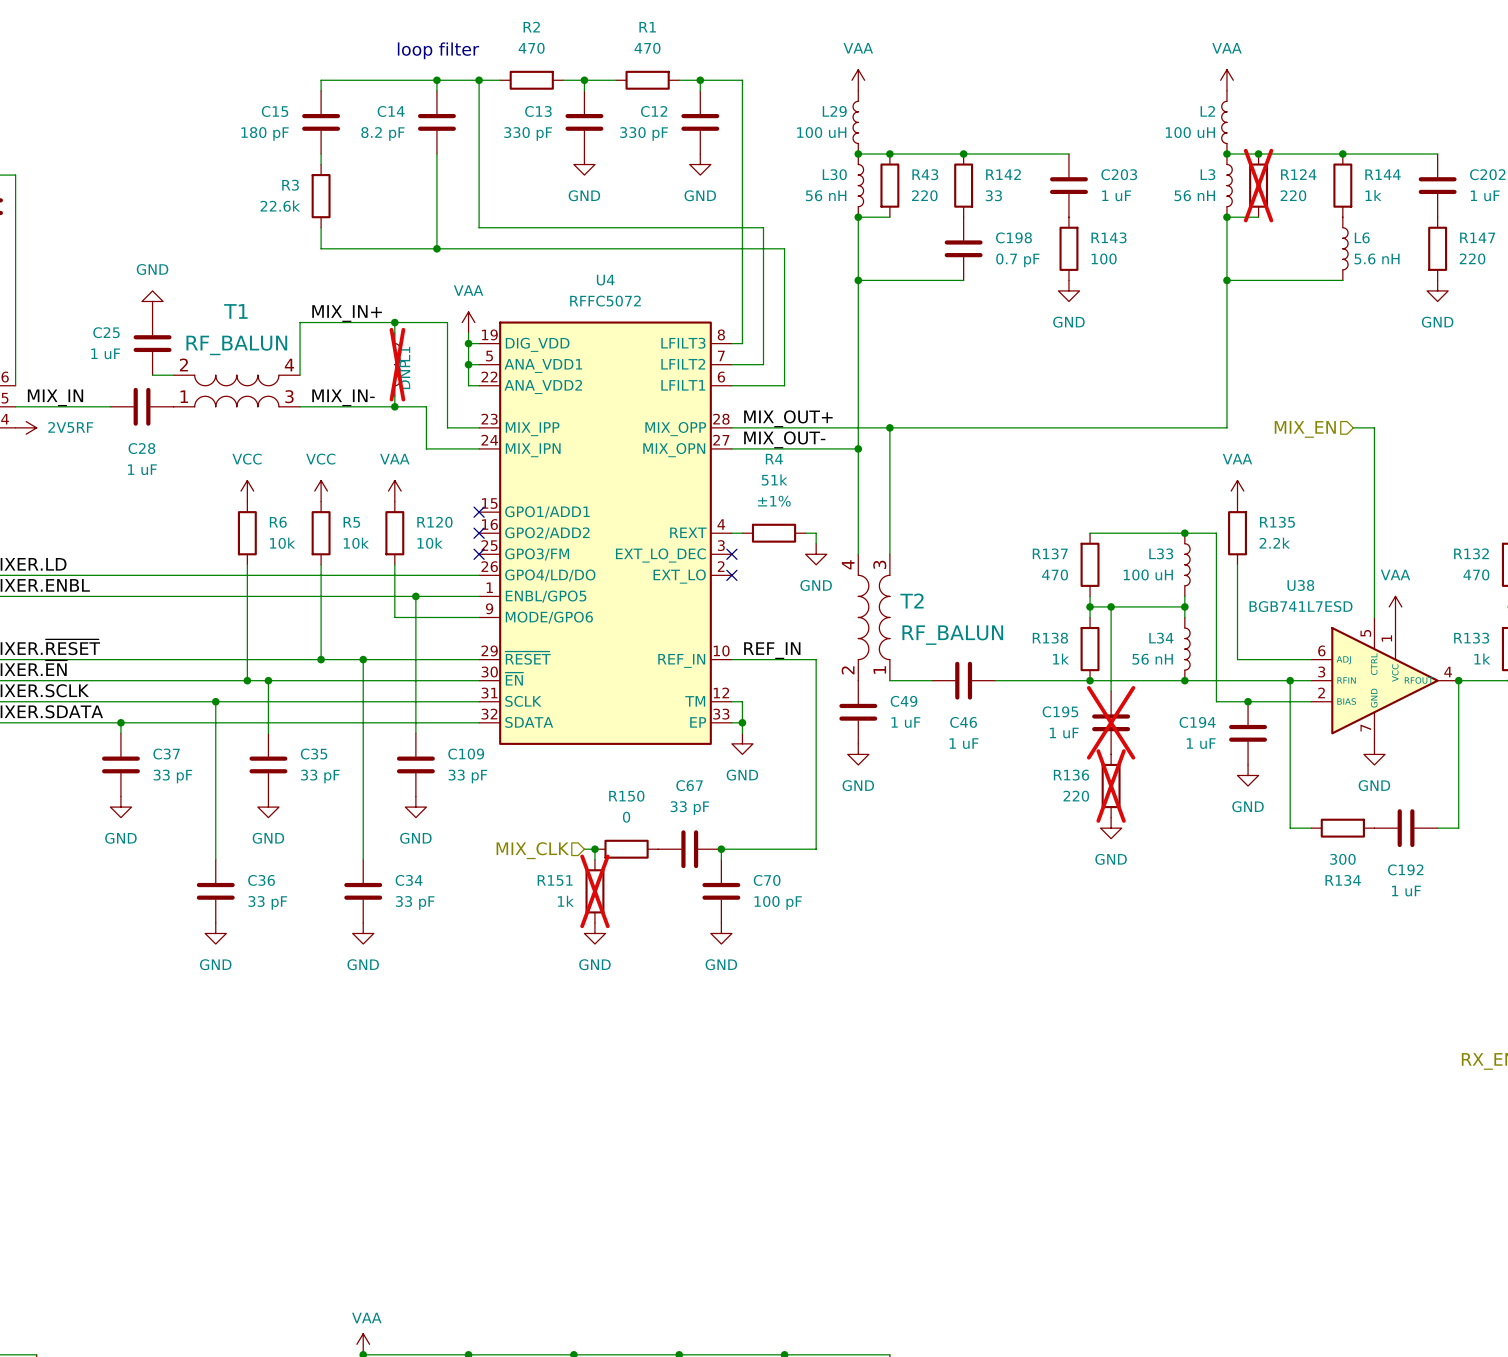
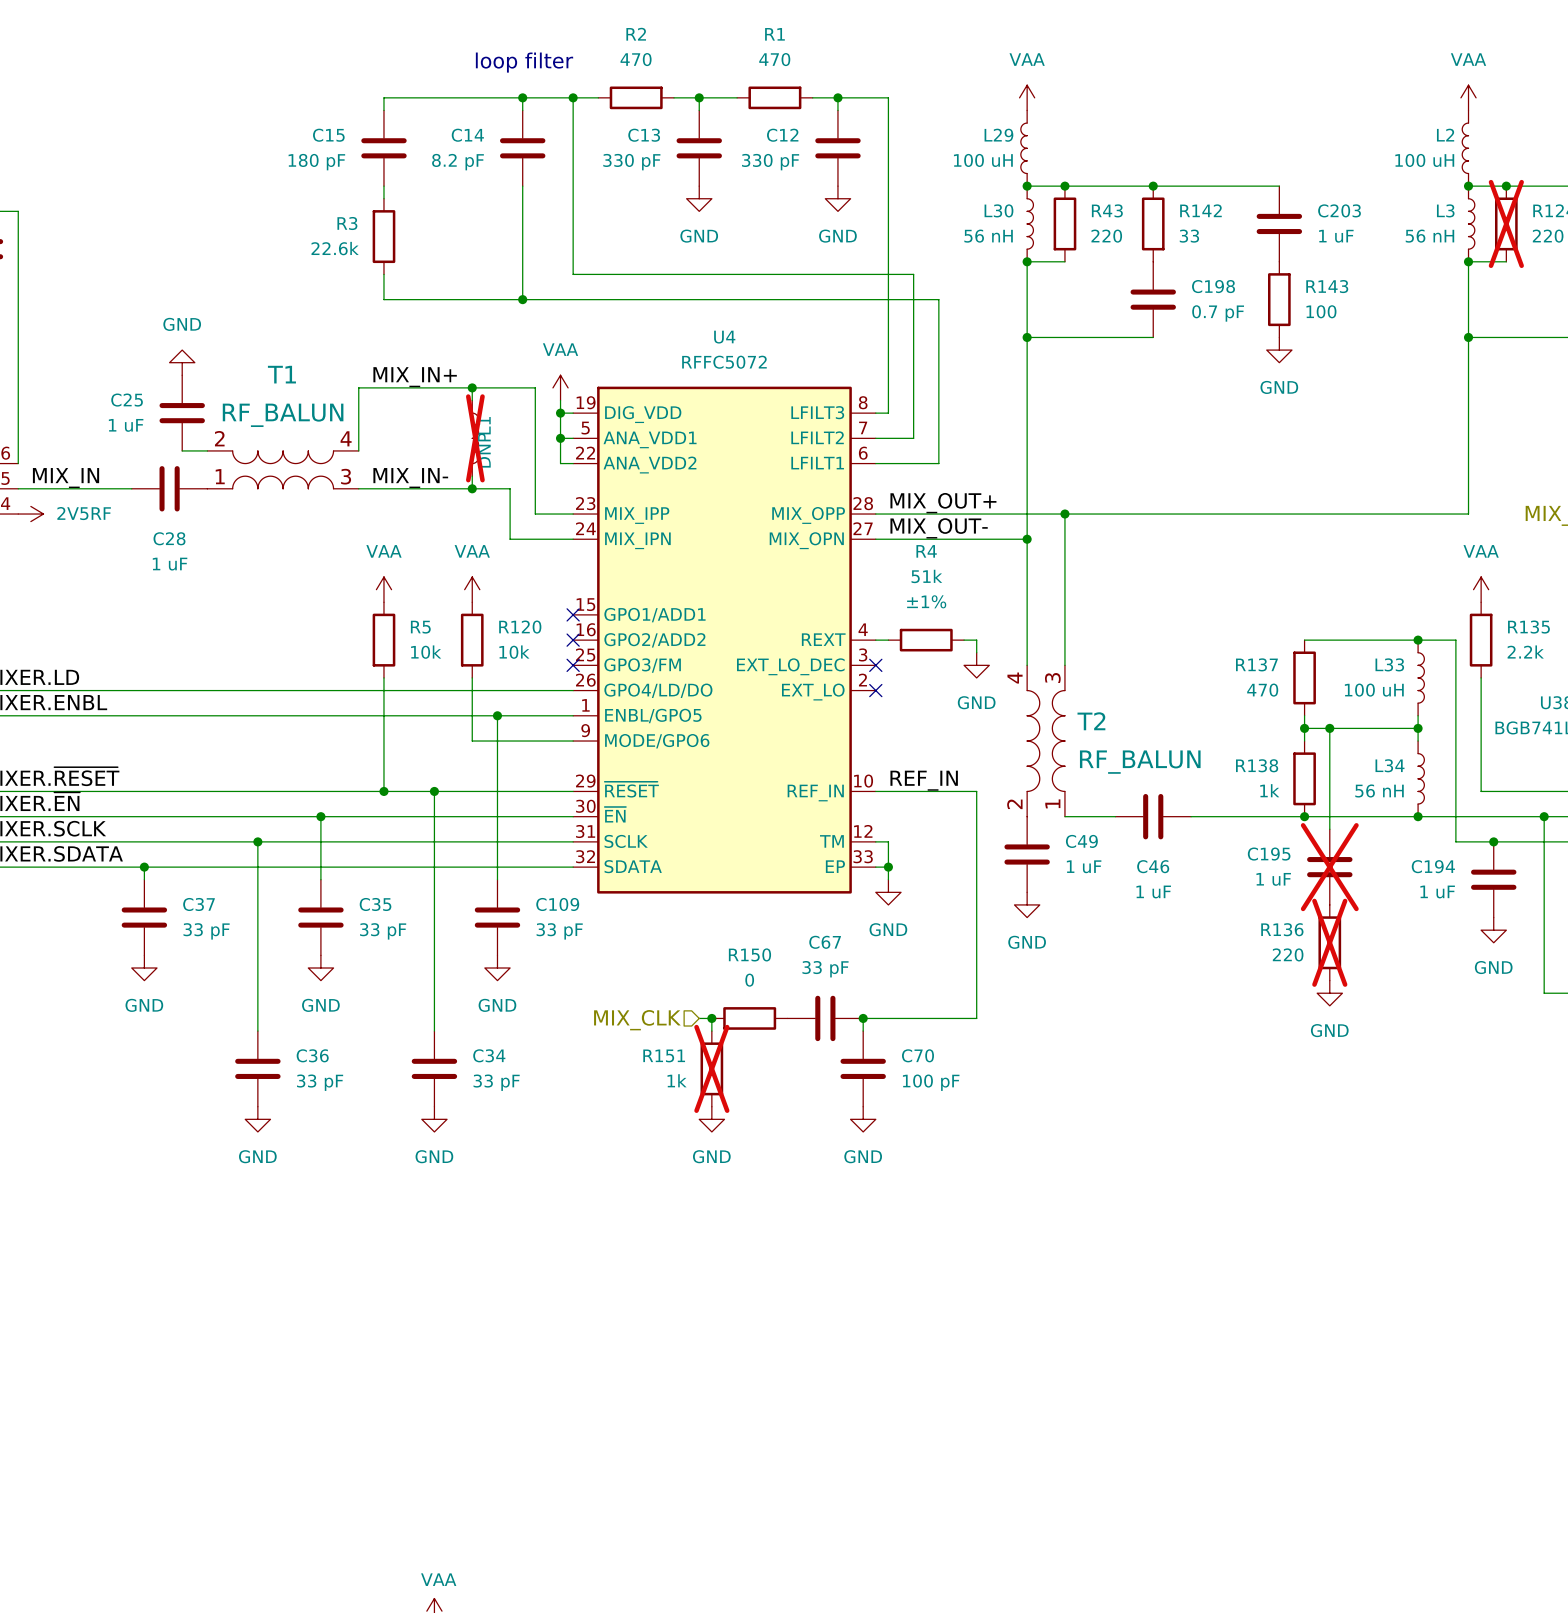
power symbol: VCC (247, 491) -> none
power symbol: VCC (321, 491) -> VAA (383, 589)
R6: 10k (247, 533) -> none
wire: (247, 564) (247, 680) -> none
junction: (247, 680) -> none

